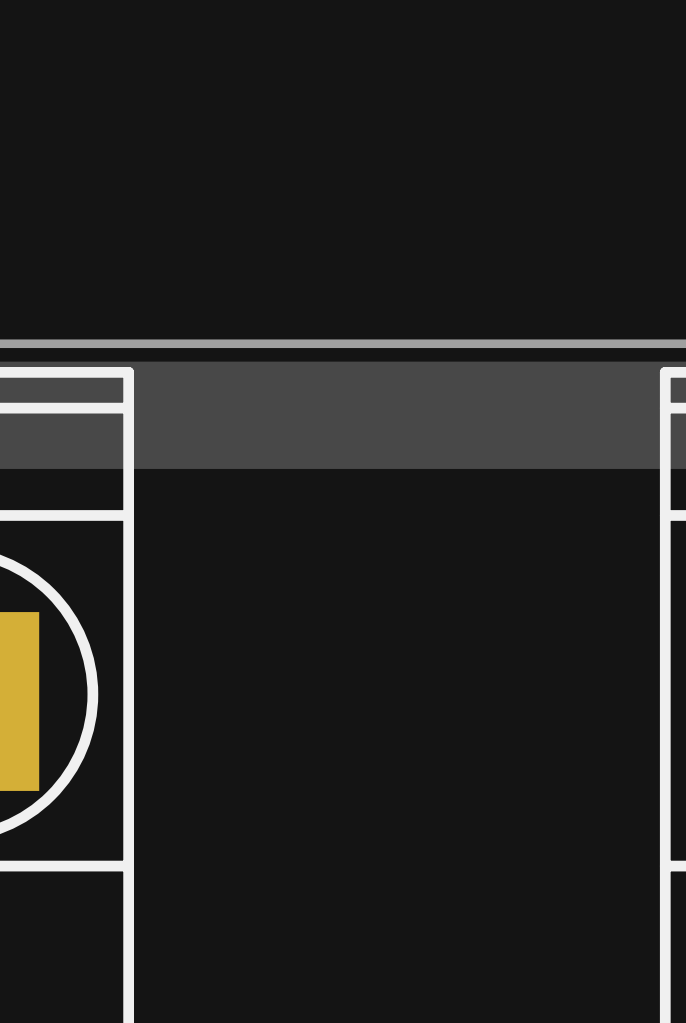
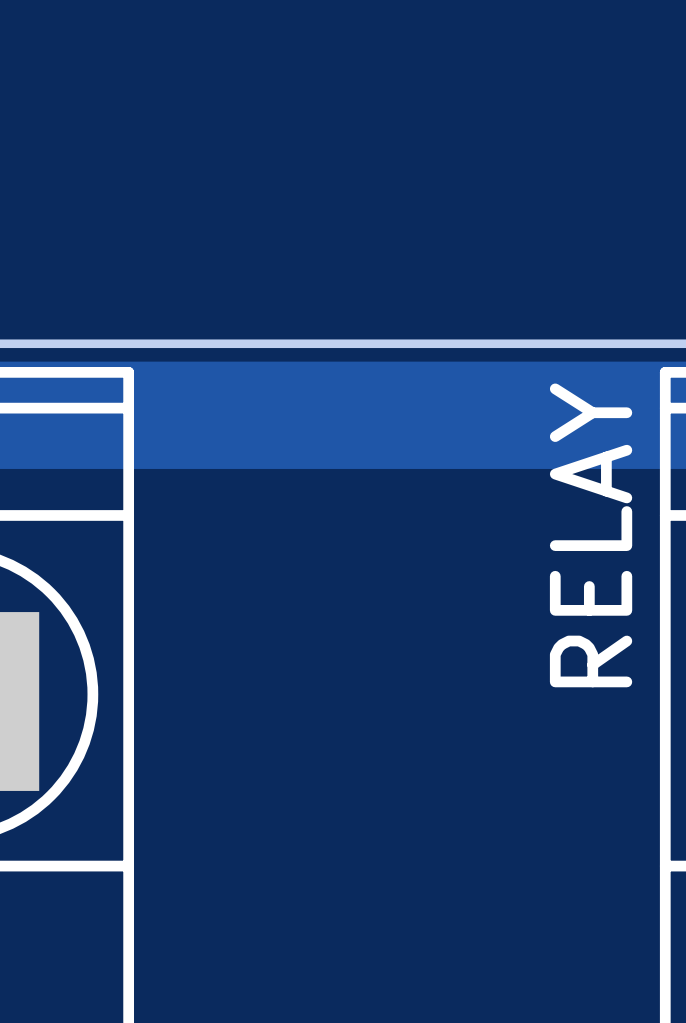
text: none -> RELAY (591, 535)

